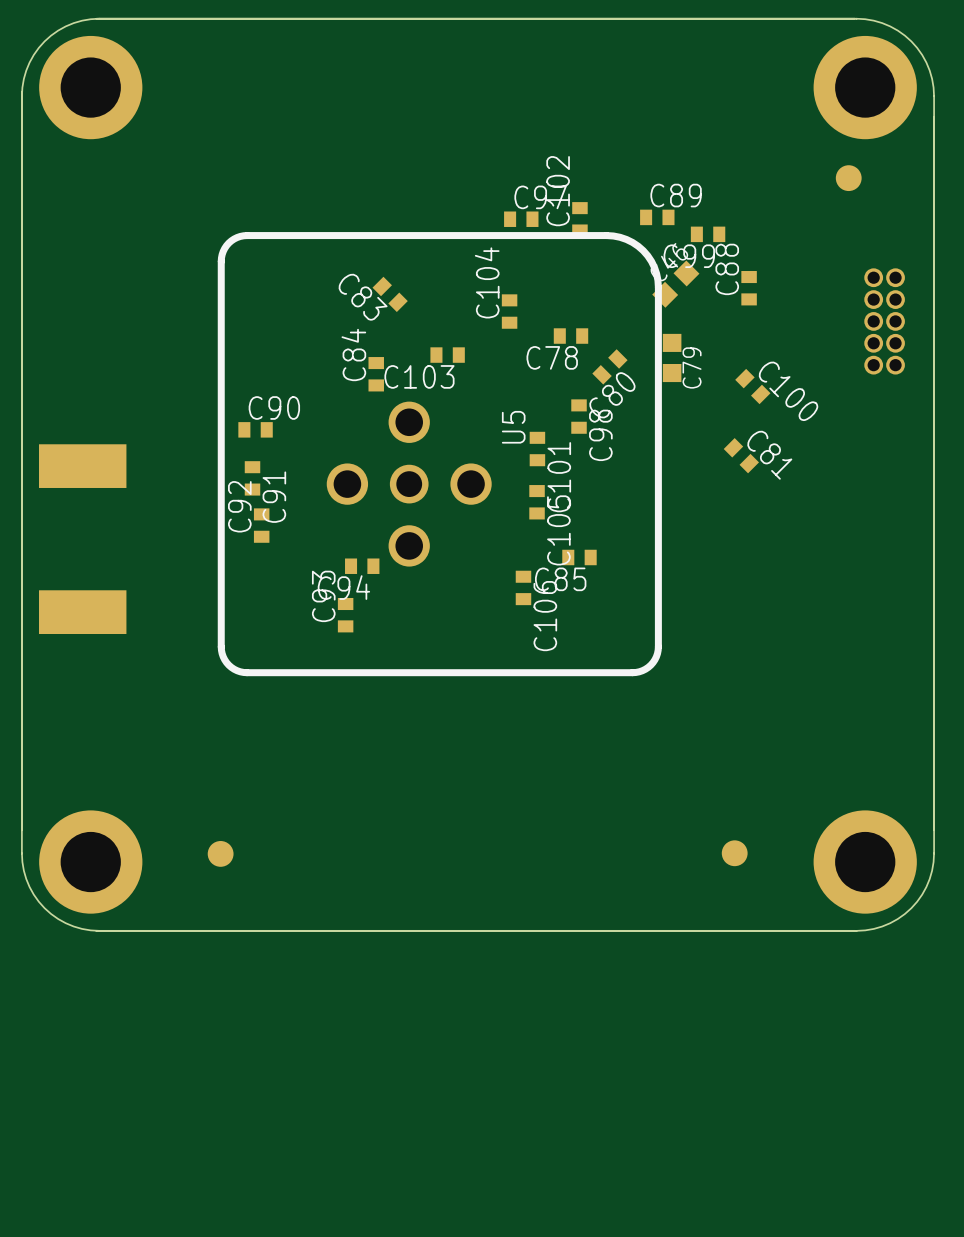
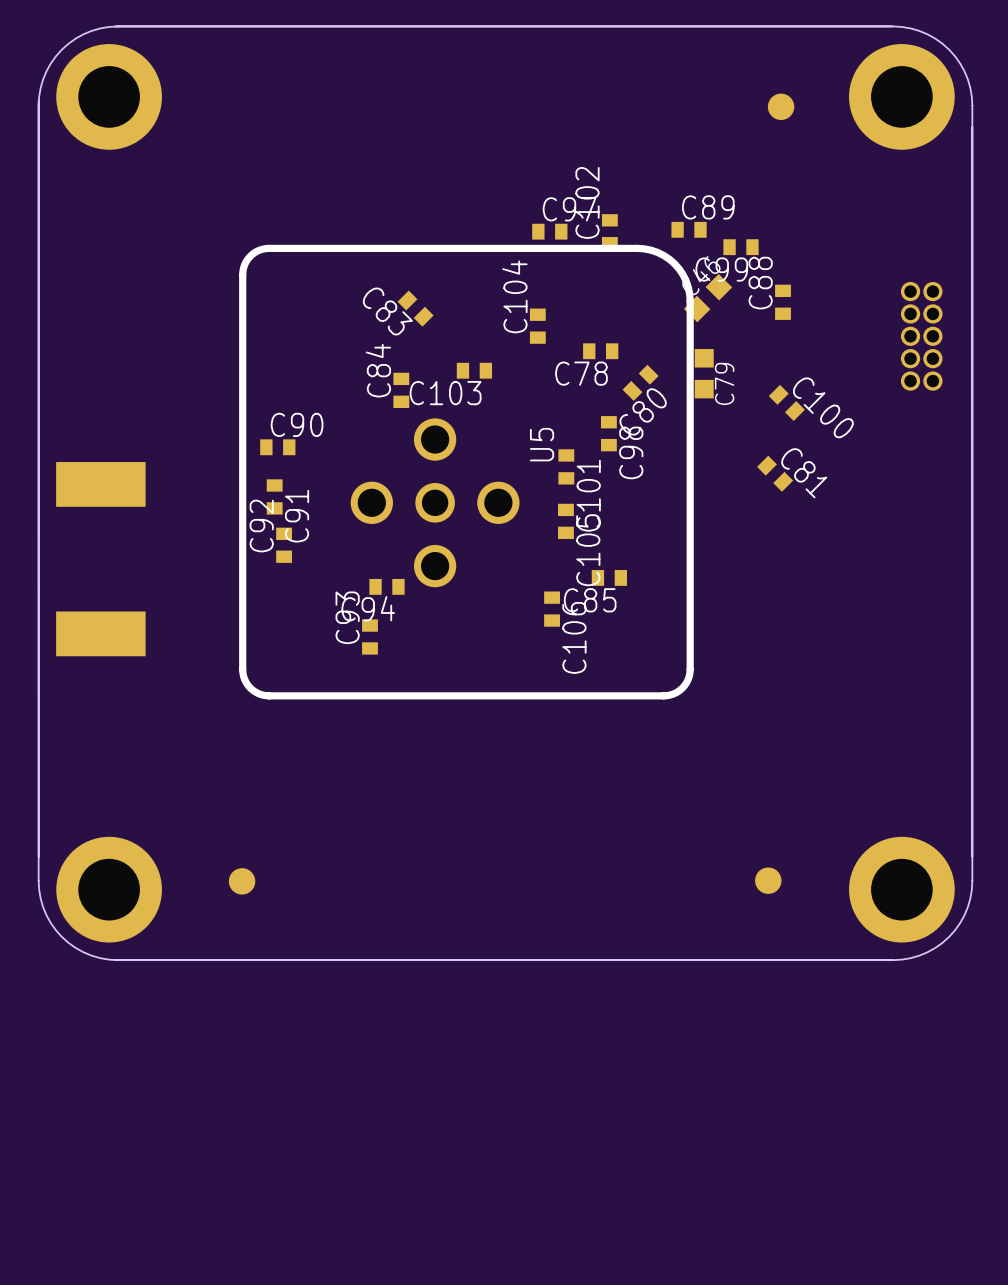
part position: (848, 178) -> (781, 106)

